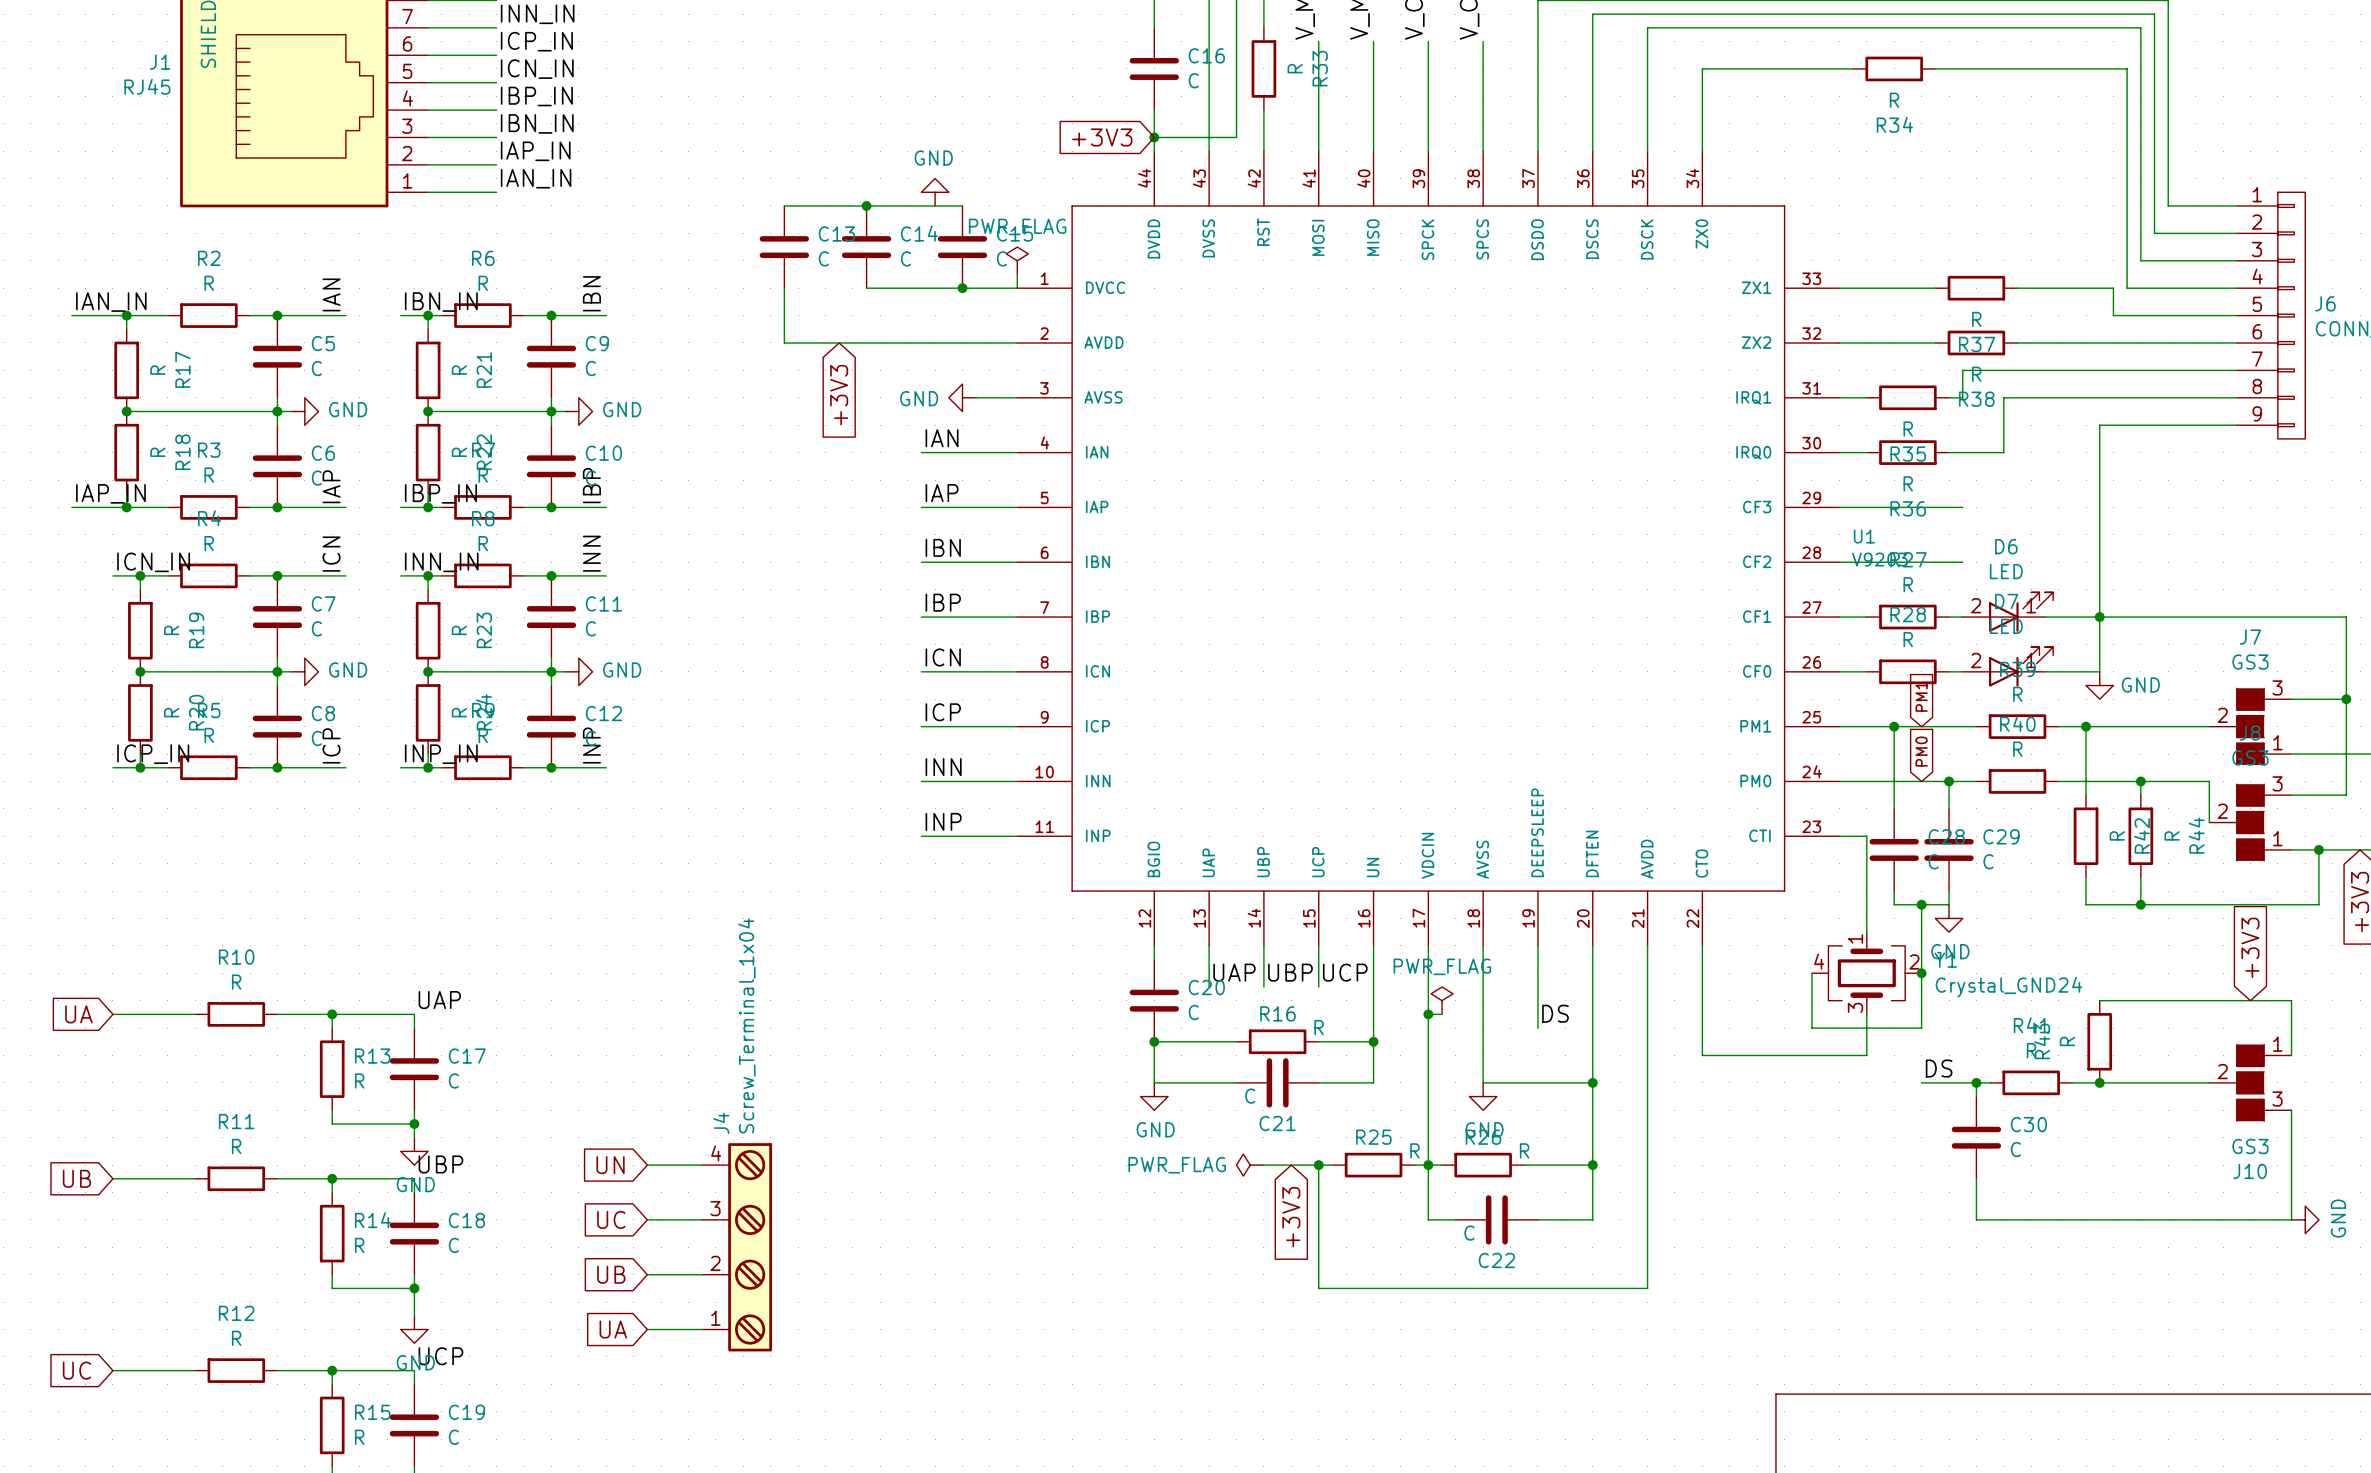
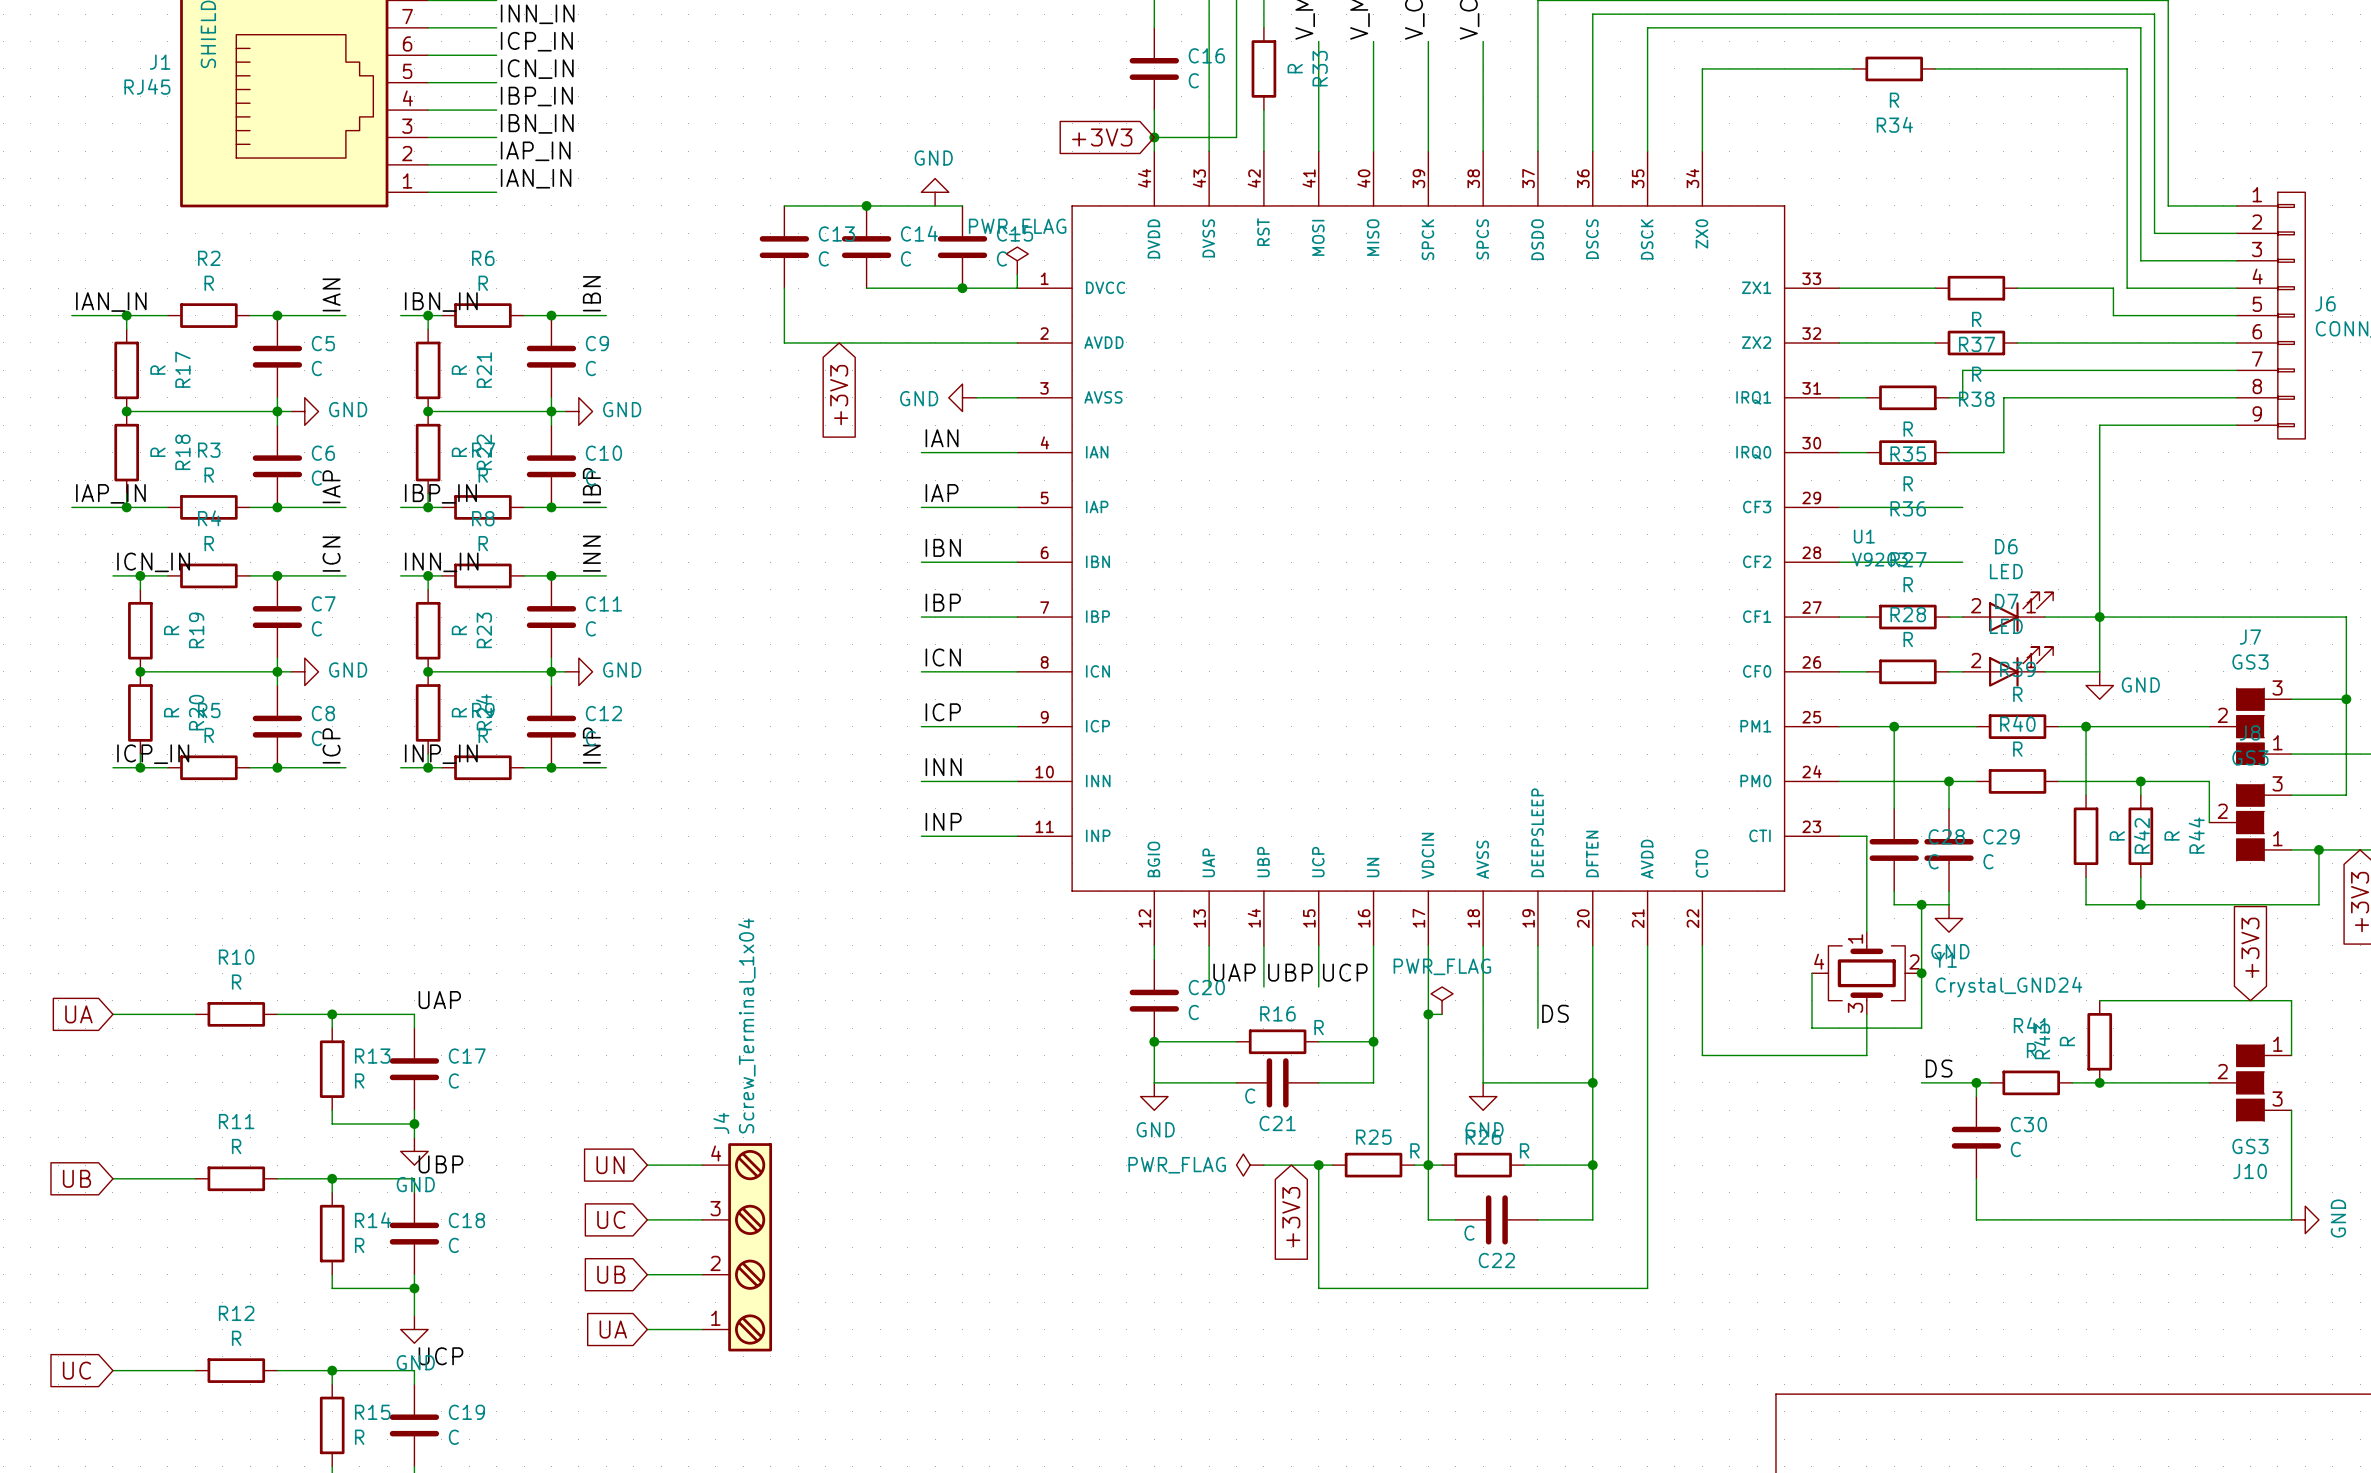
global label: PM1 (1921, 696) -> none
global label: PM0 (1921, 751) -> none

